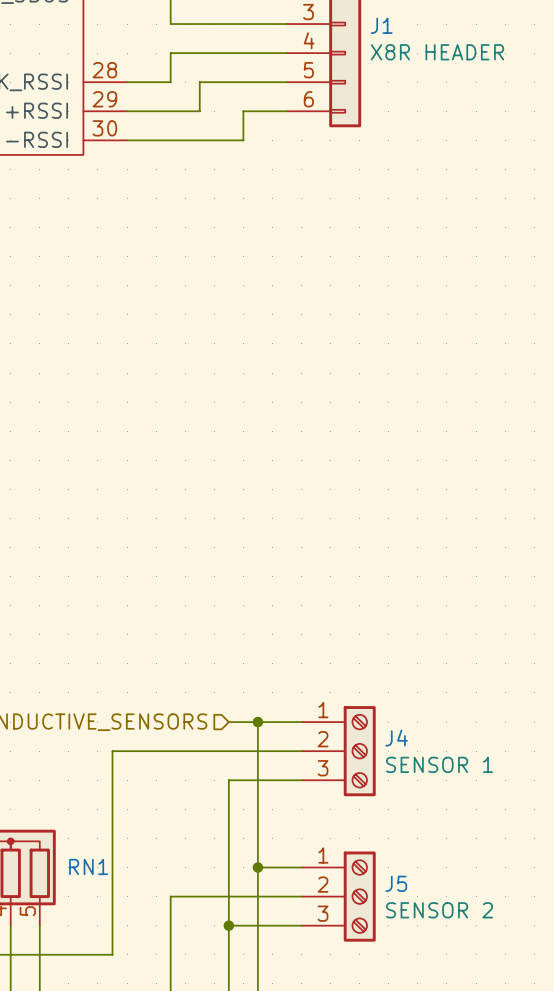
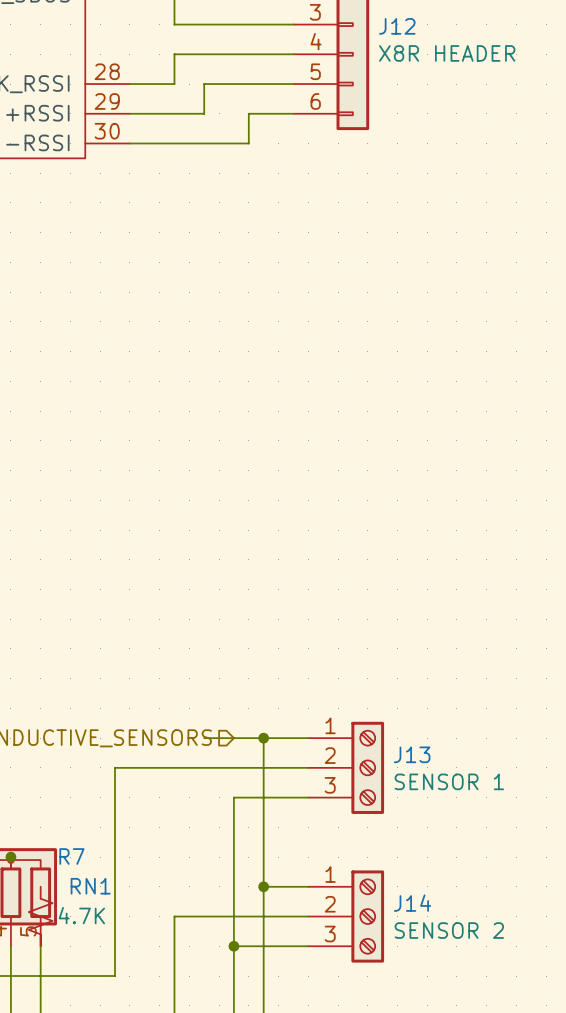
J1 name: J1 (381, 25) -> J12 (397, 26)
wire: none -> (204, 738) (233, 738)
J4 name: J4 (396, 738) -> J13 (412, 754)
junction: none -> (10, 857)
J5 name: J5 (396, 883) -> J14 (412, 903)
R7: none -> 4.7K (40, 916)

